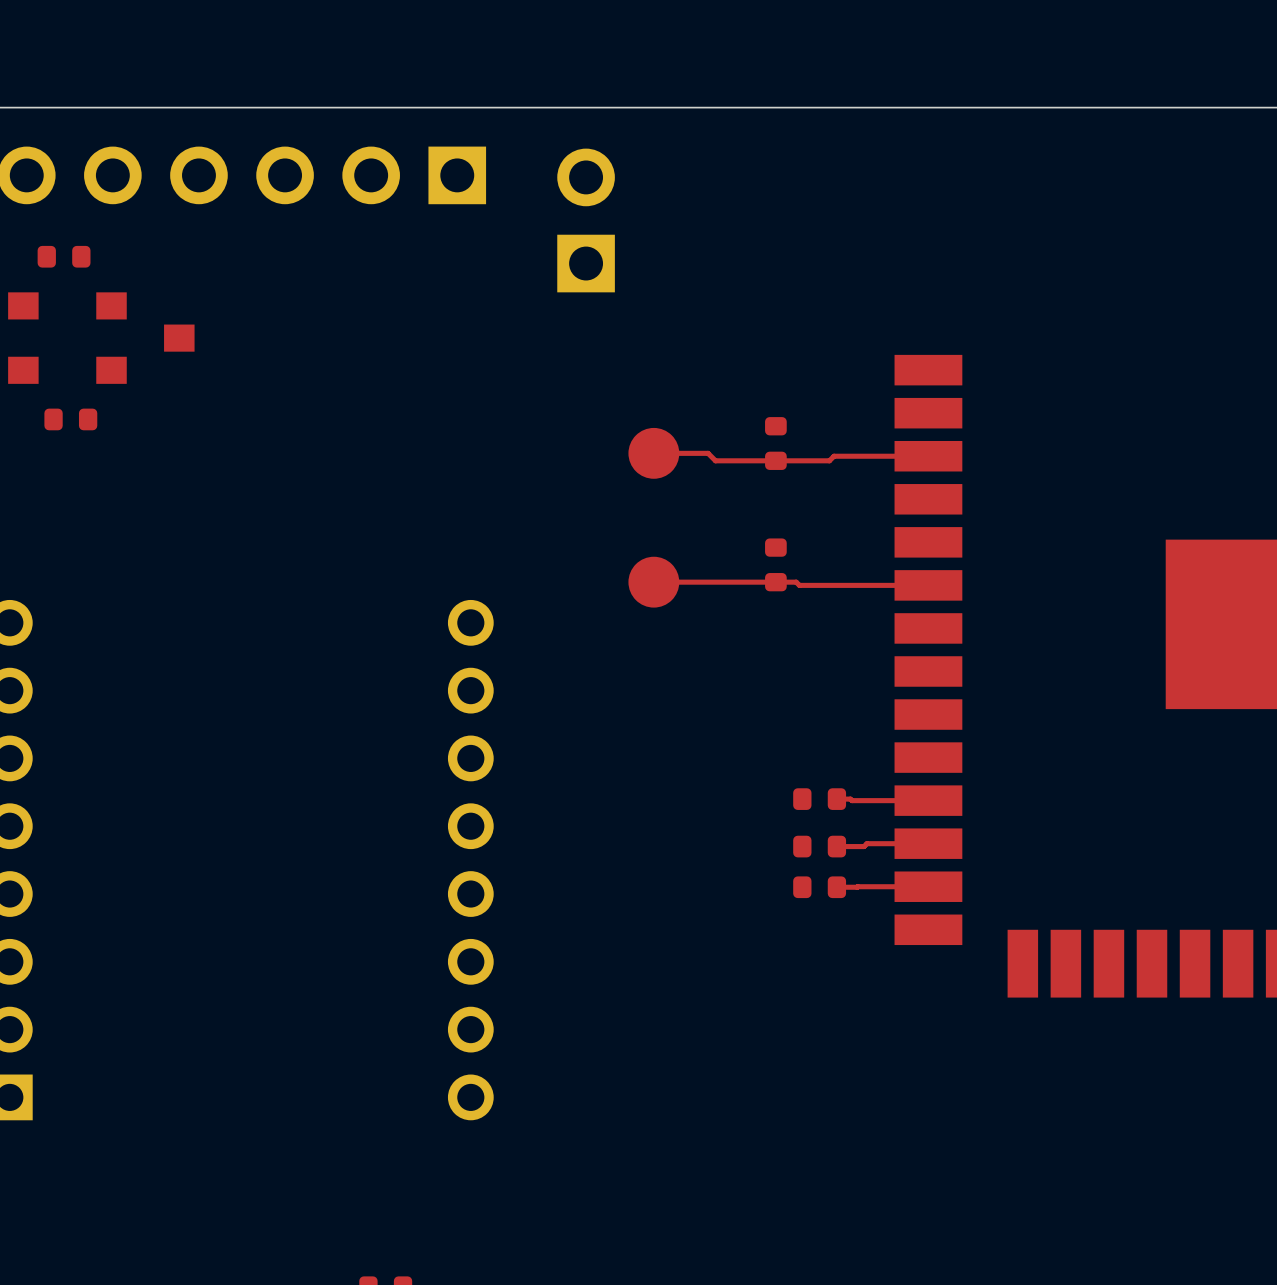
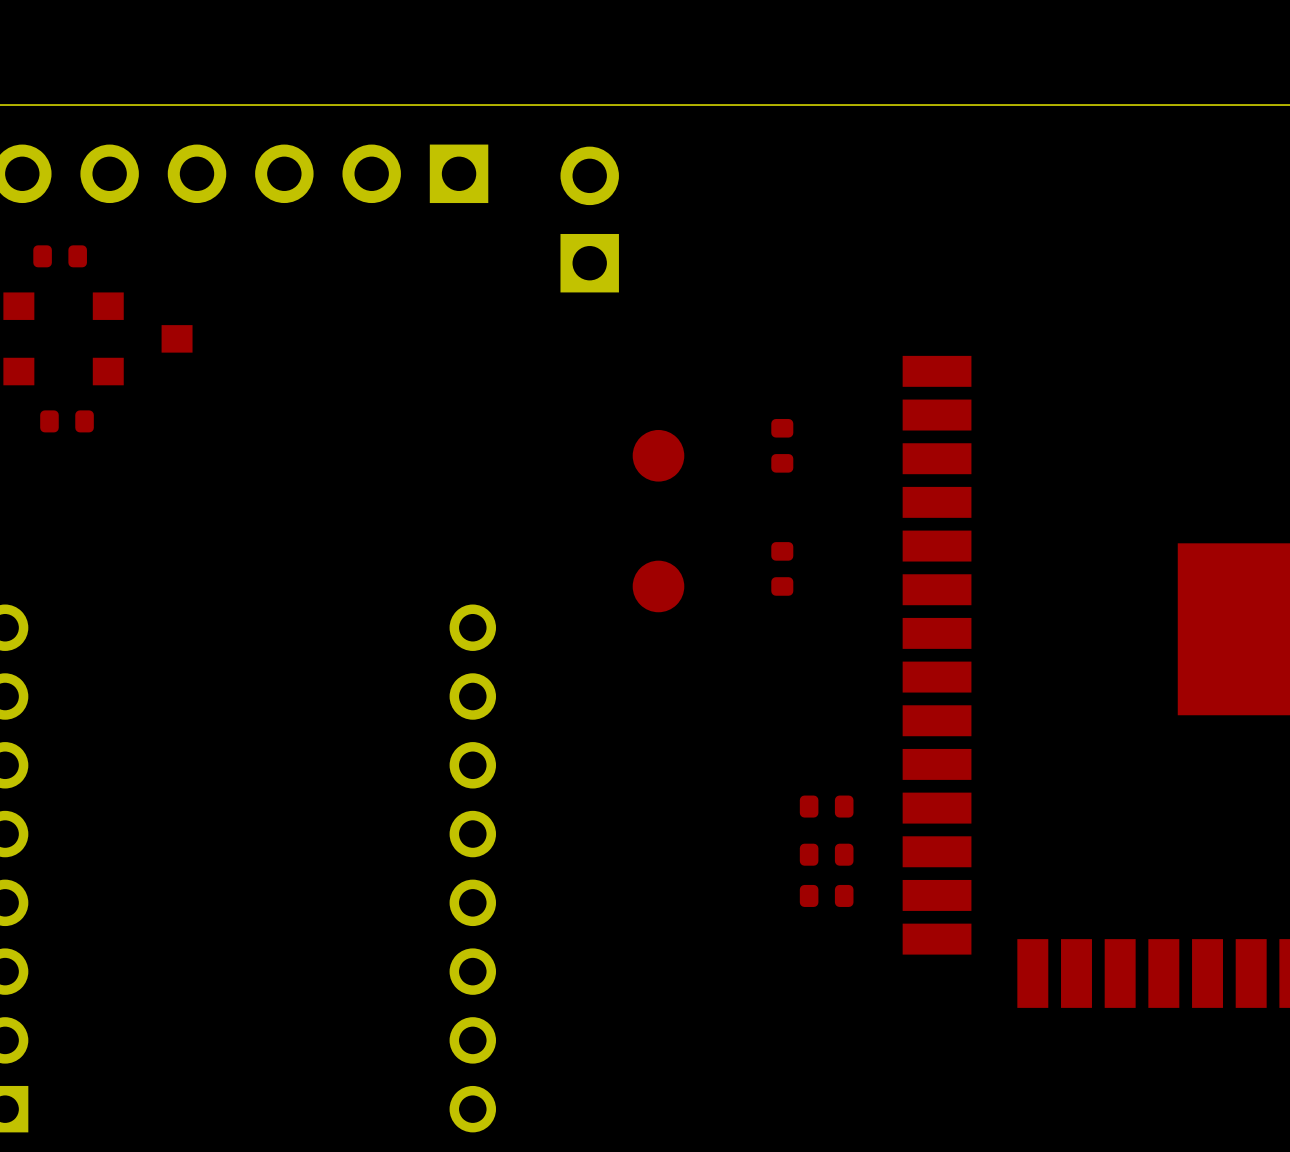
top track: (653, 453) (708, 453) (715, 460) (829, 460) (834, 456) (928, 456) -> none
top track: (653, 582) (796, 582) (799, 585) (928, 585) -> none
top track: (836, 799) (928, 800) -> none
top track: (928, 843) (866, 843) (864, 846) (836, 846) -> none
top track: (928, 886) (836, 887) -> none

